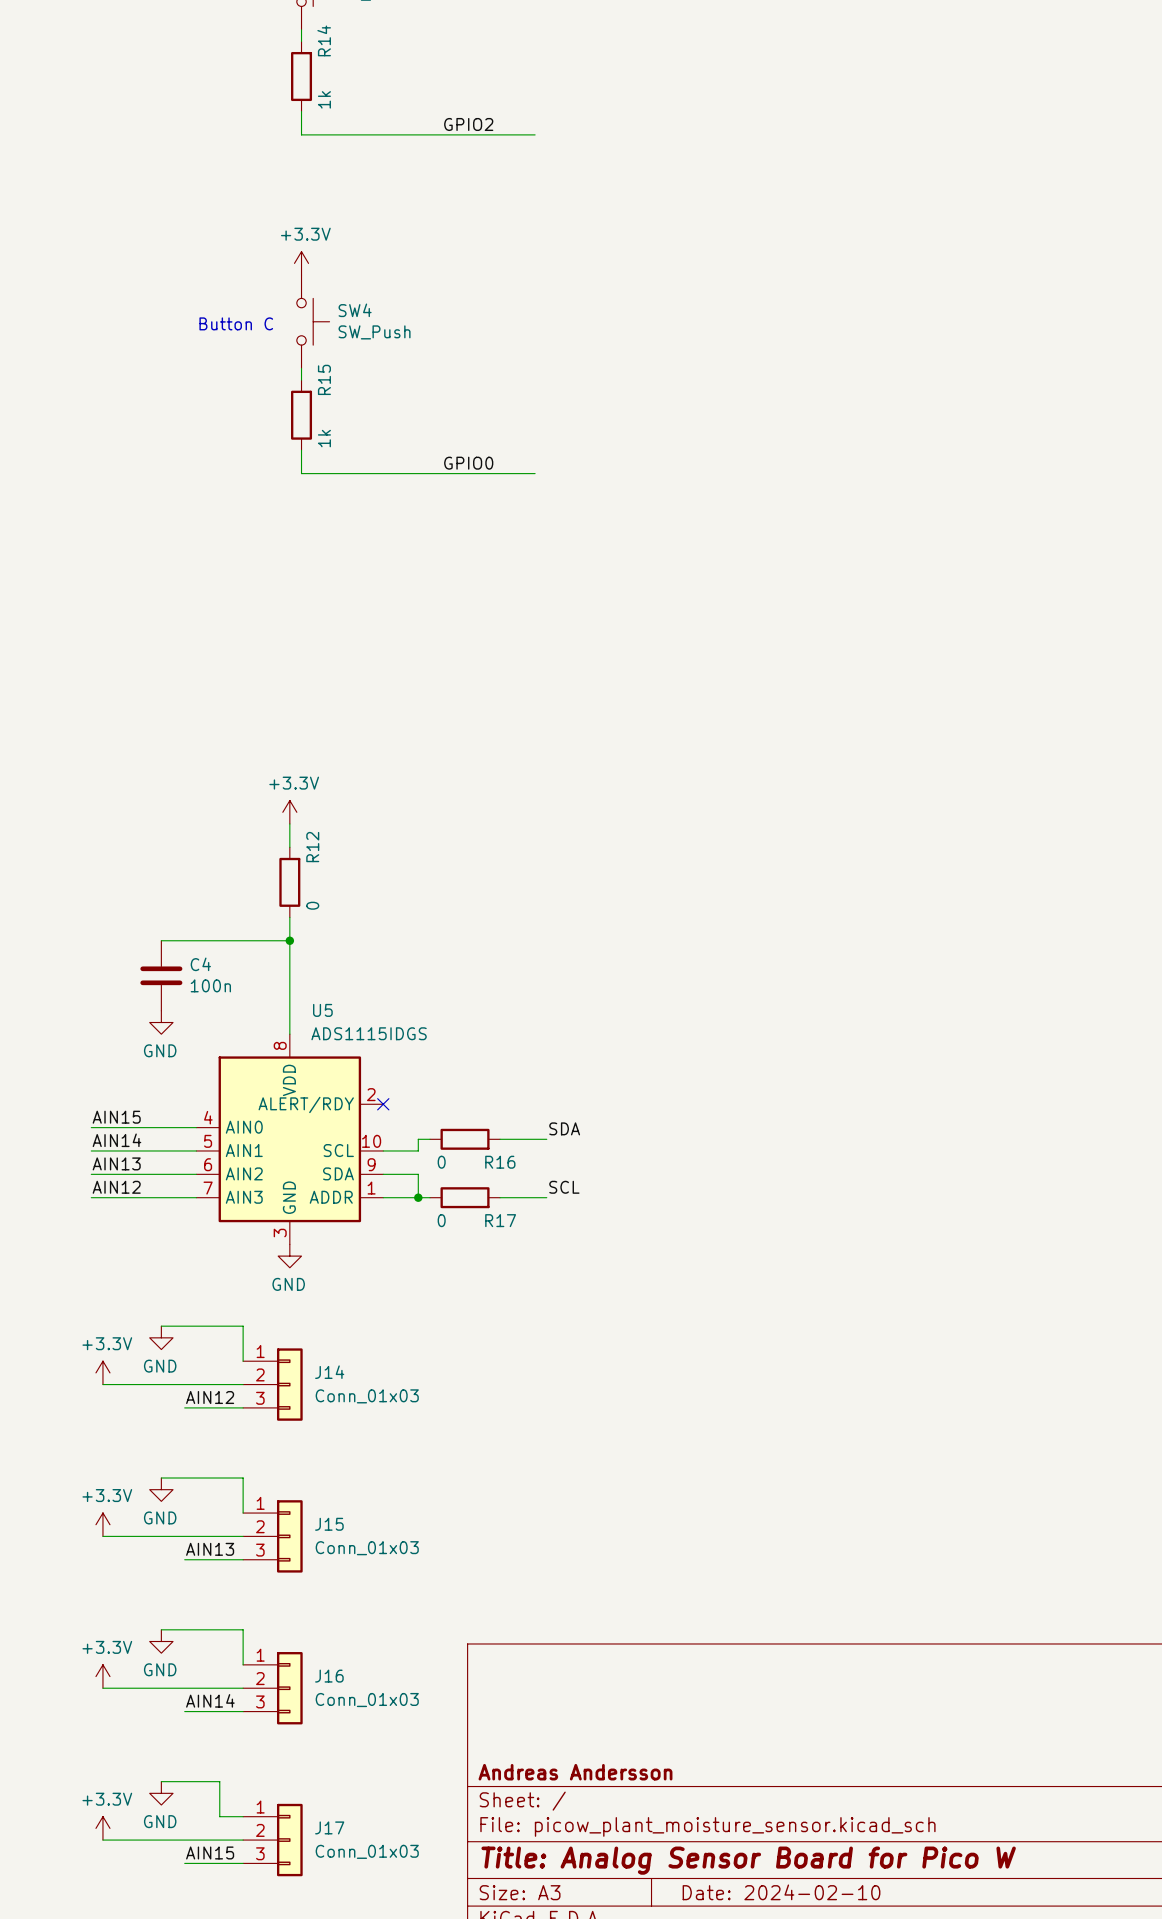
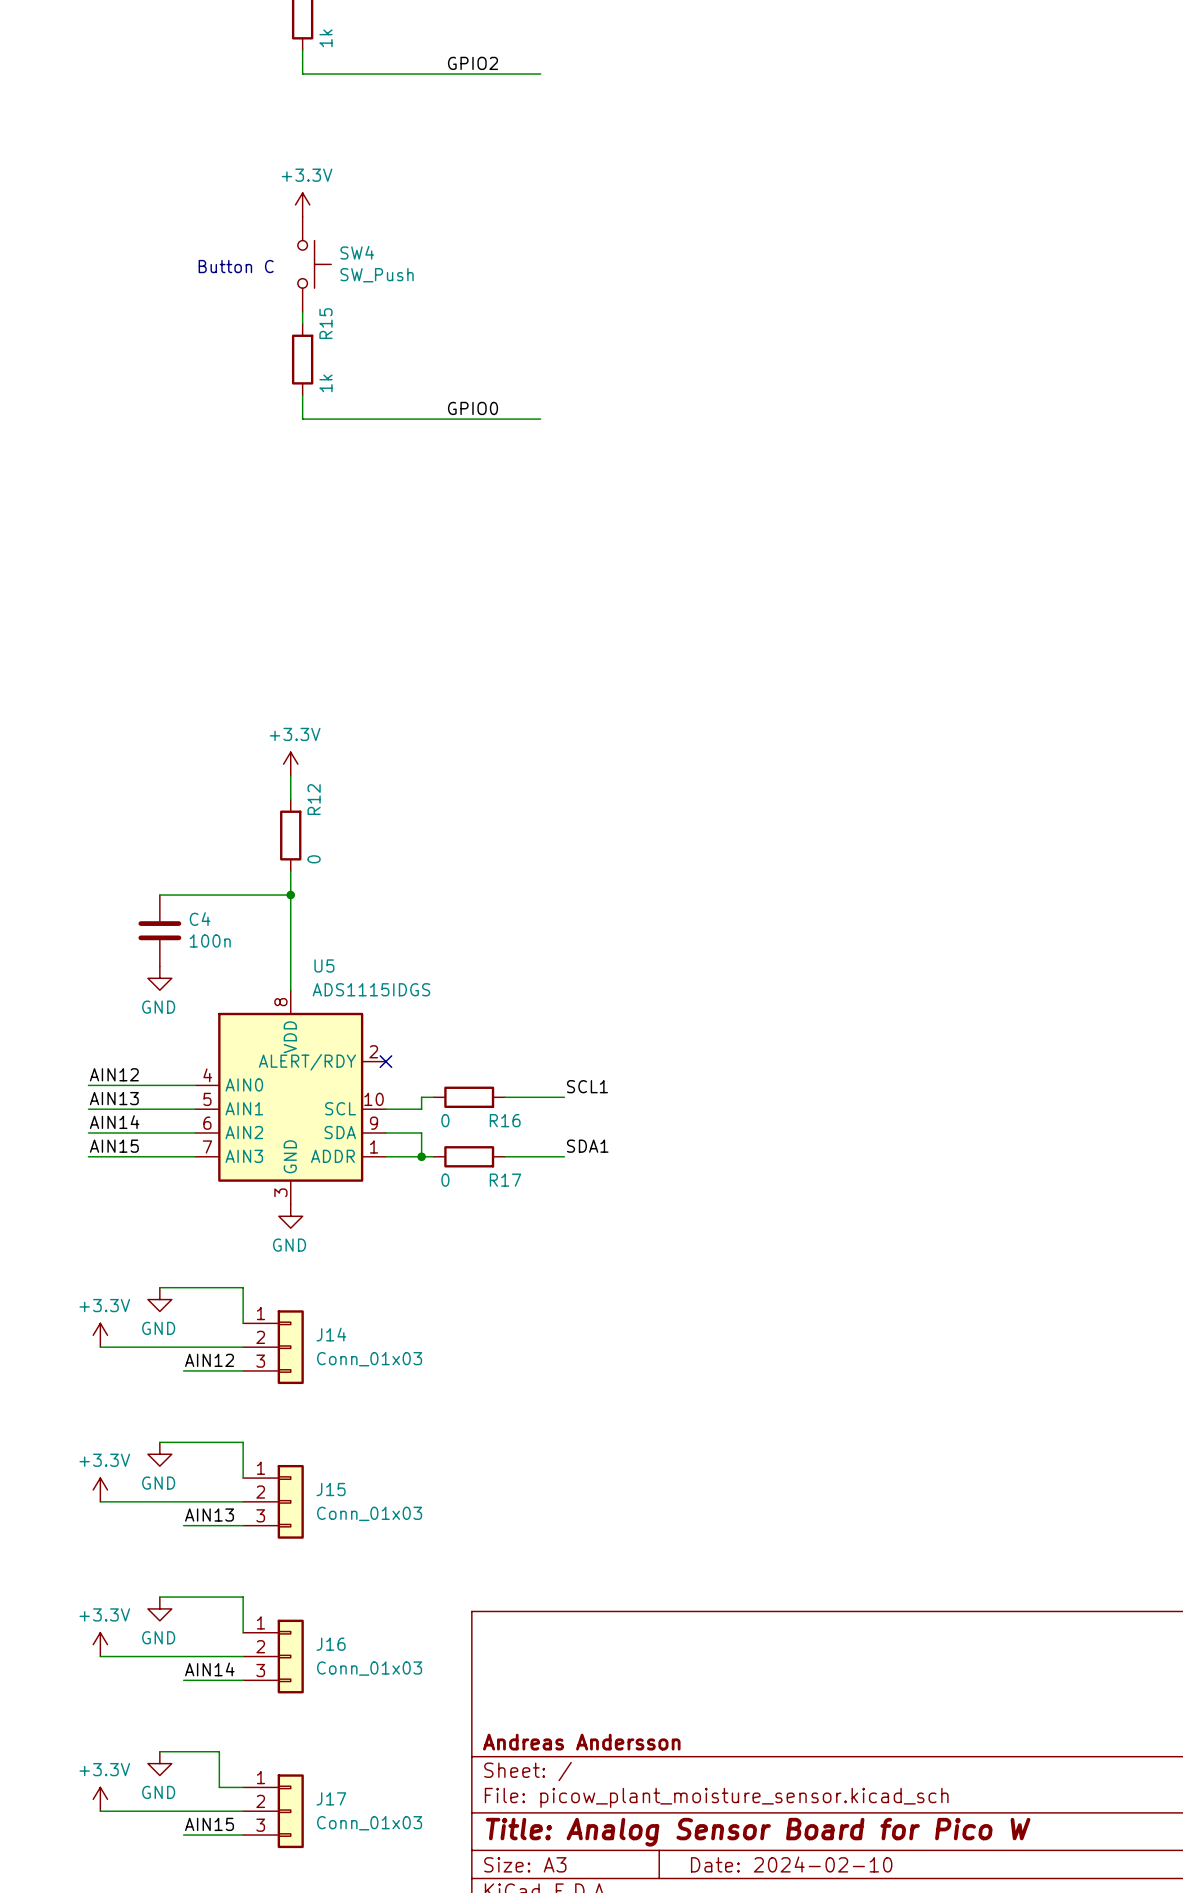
label: AIN15 (116, 1117) -> AIN12 (114, 1074)
label: SDA (564, 1128) -> none
label: none -> SCL1 (587, 1086)
wire: none -> (552, 1097) (564, 1097)
label: AIN14 (116, 1140) -> AIN13 (114, 1098)
label: AIN13 (116, 1163) -> AIN14 (114, 1122)
label: AIN12 (116, 1187) -> AIN15 (114, 1146)
label: SCL (564, 1187) -> none
label: none -> SDA1 (587, 1146)
wire: none -> (552, 1156) (564, 1156)

